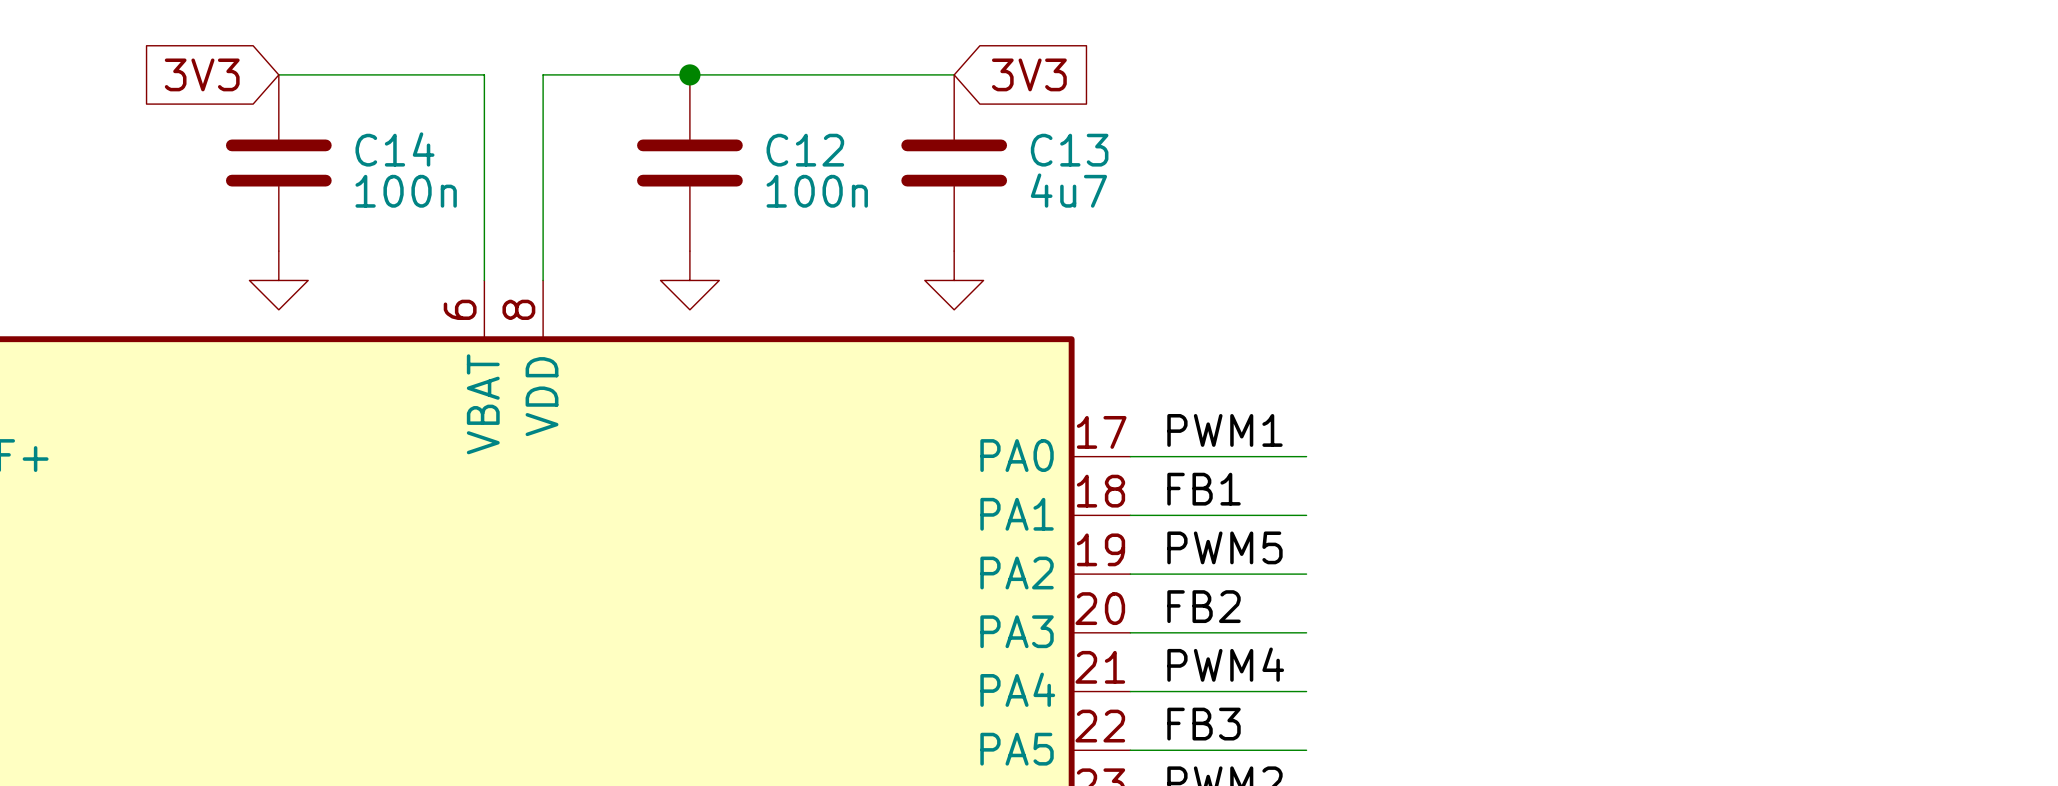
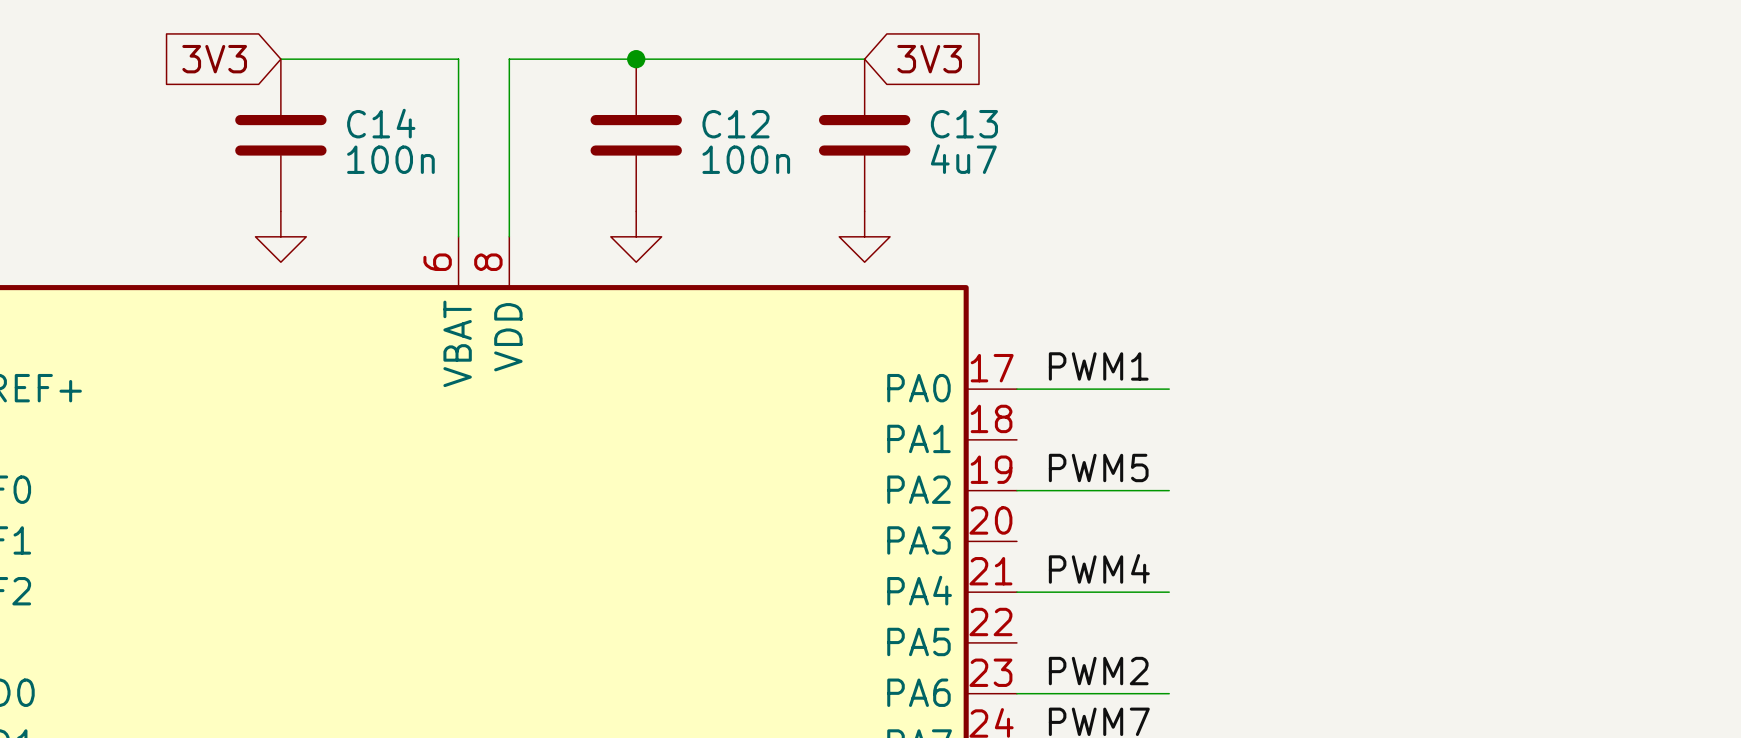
label: FB1 (1204, 489) -> none
wire: (1130, 515) (1306, 515) -> none
label: FB2 (1204, 606) -> none
wire: (1130, 632) (1306, 632) -> none
label: FB3 (1204, 724) -> none
wire: (1130, 750) (1306, 750) -> none

